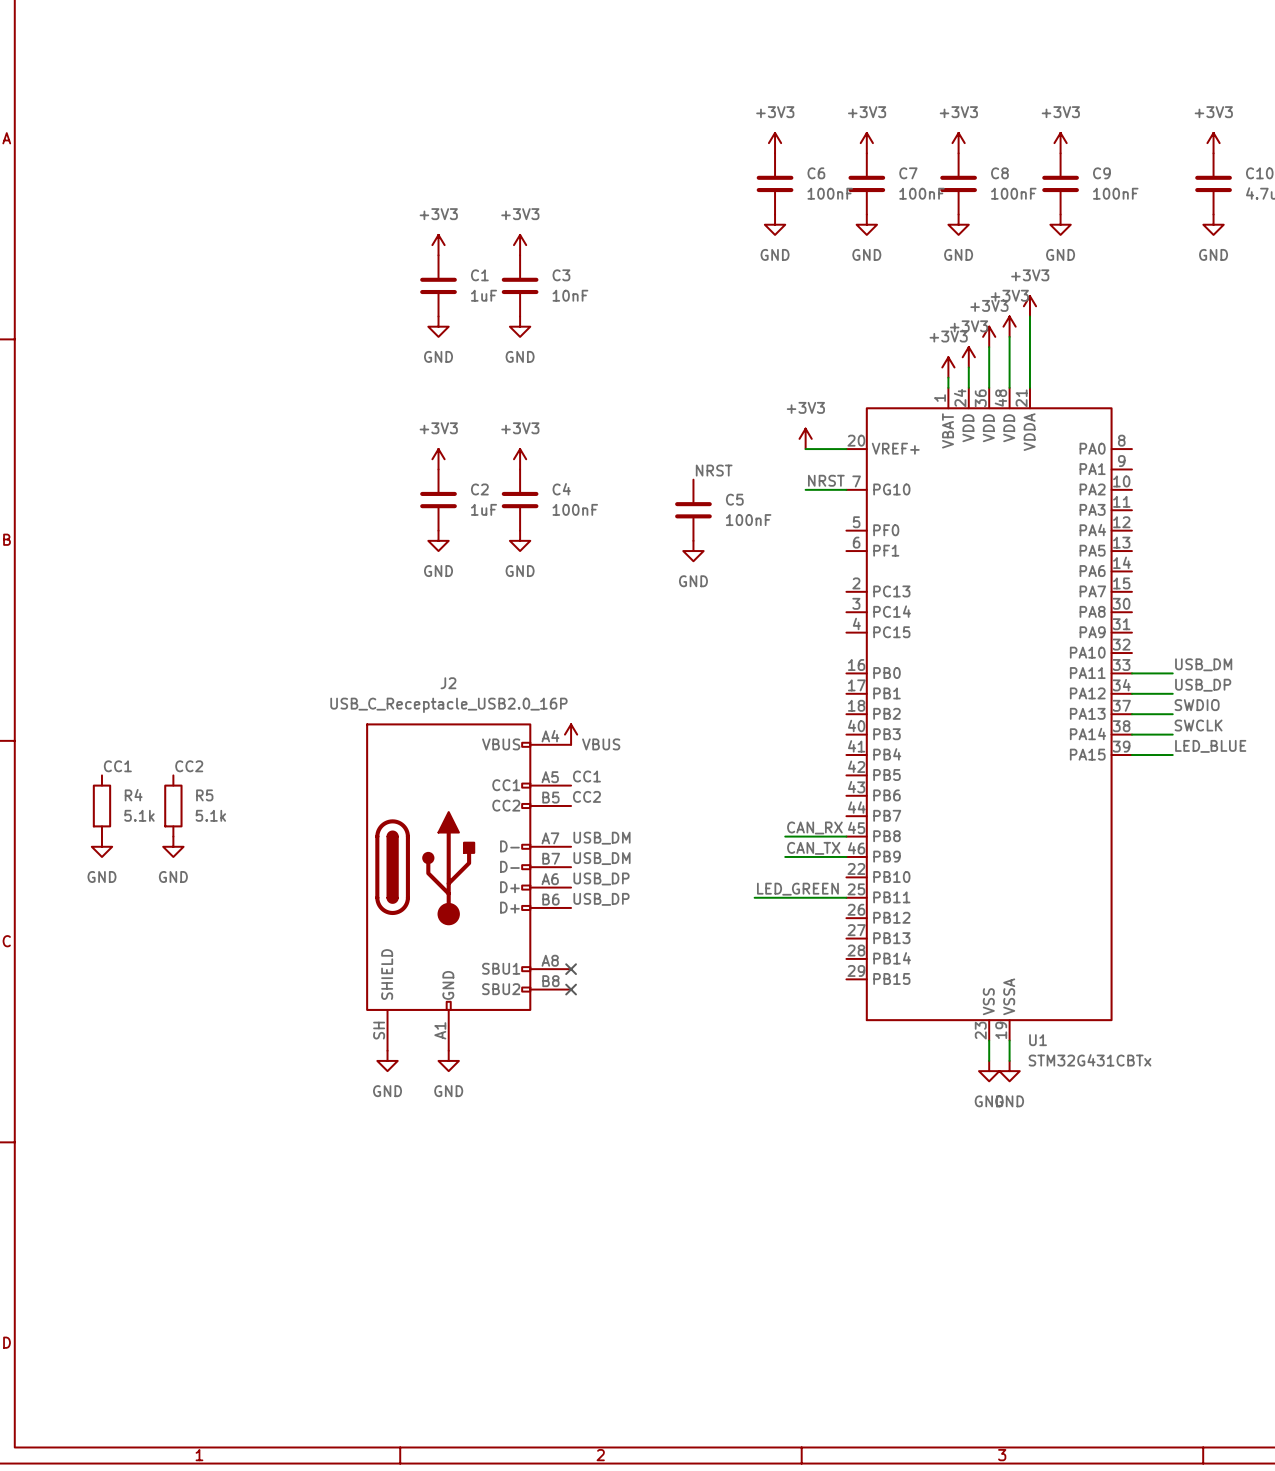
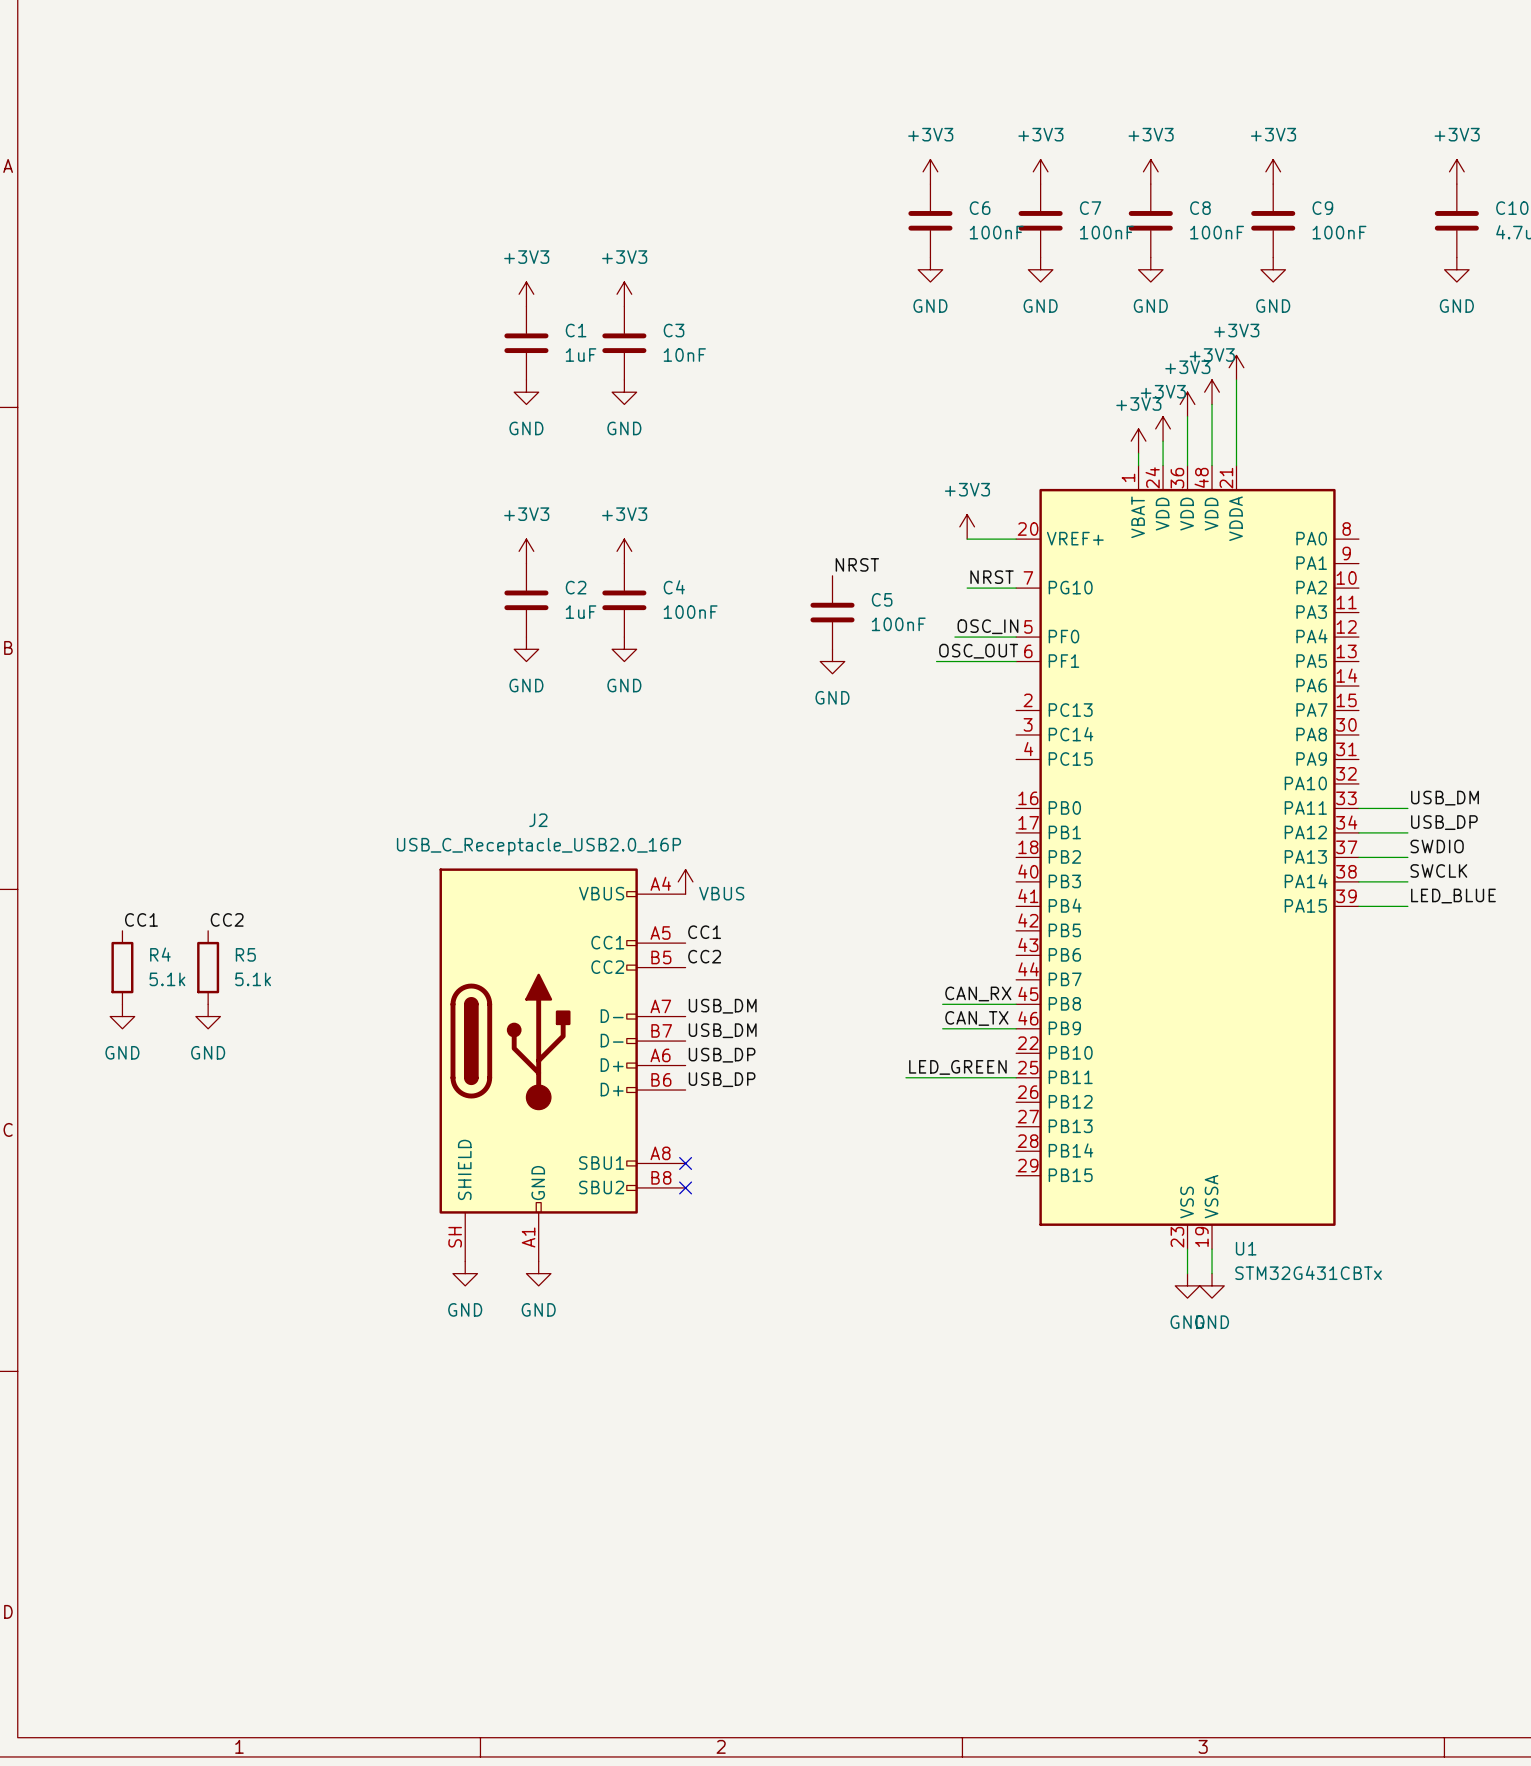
label: none -> OSC_IN (987, 626)
wire: none -> (954, 637) (1016, 637)
label: none -> OSC_OUT (978, 651)
wire: none -> (936, 661) (1016, 661)

